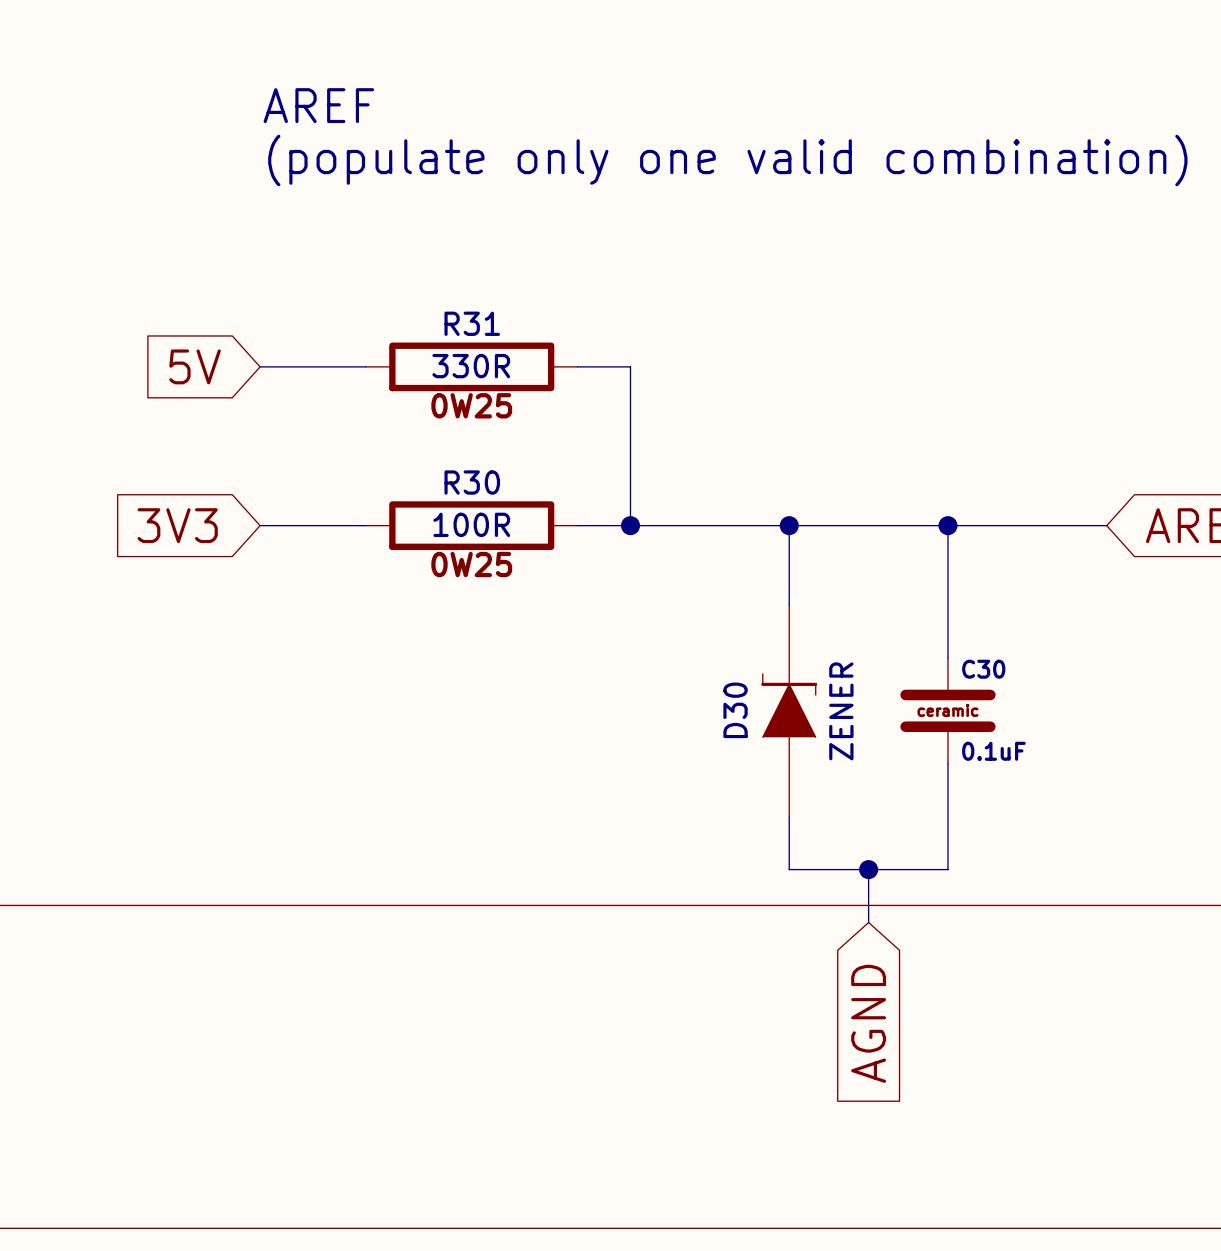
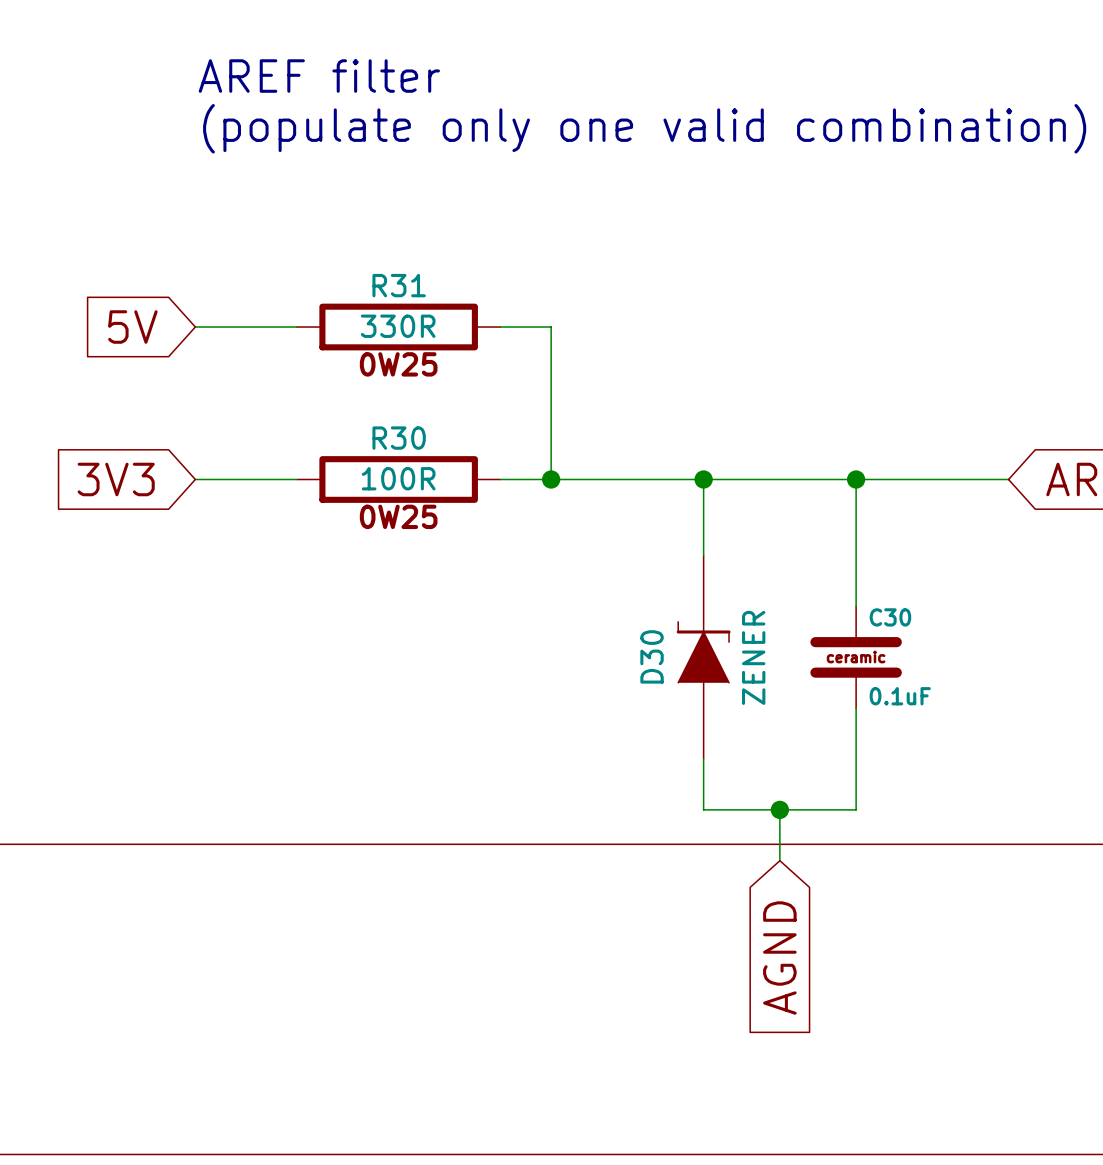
text: AREF (318, 105) -> AREF filter (319, 76)

